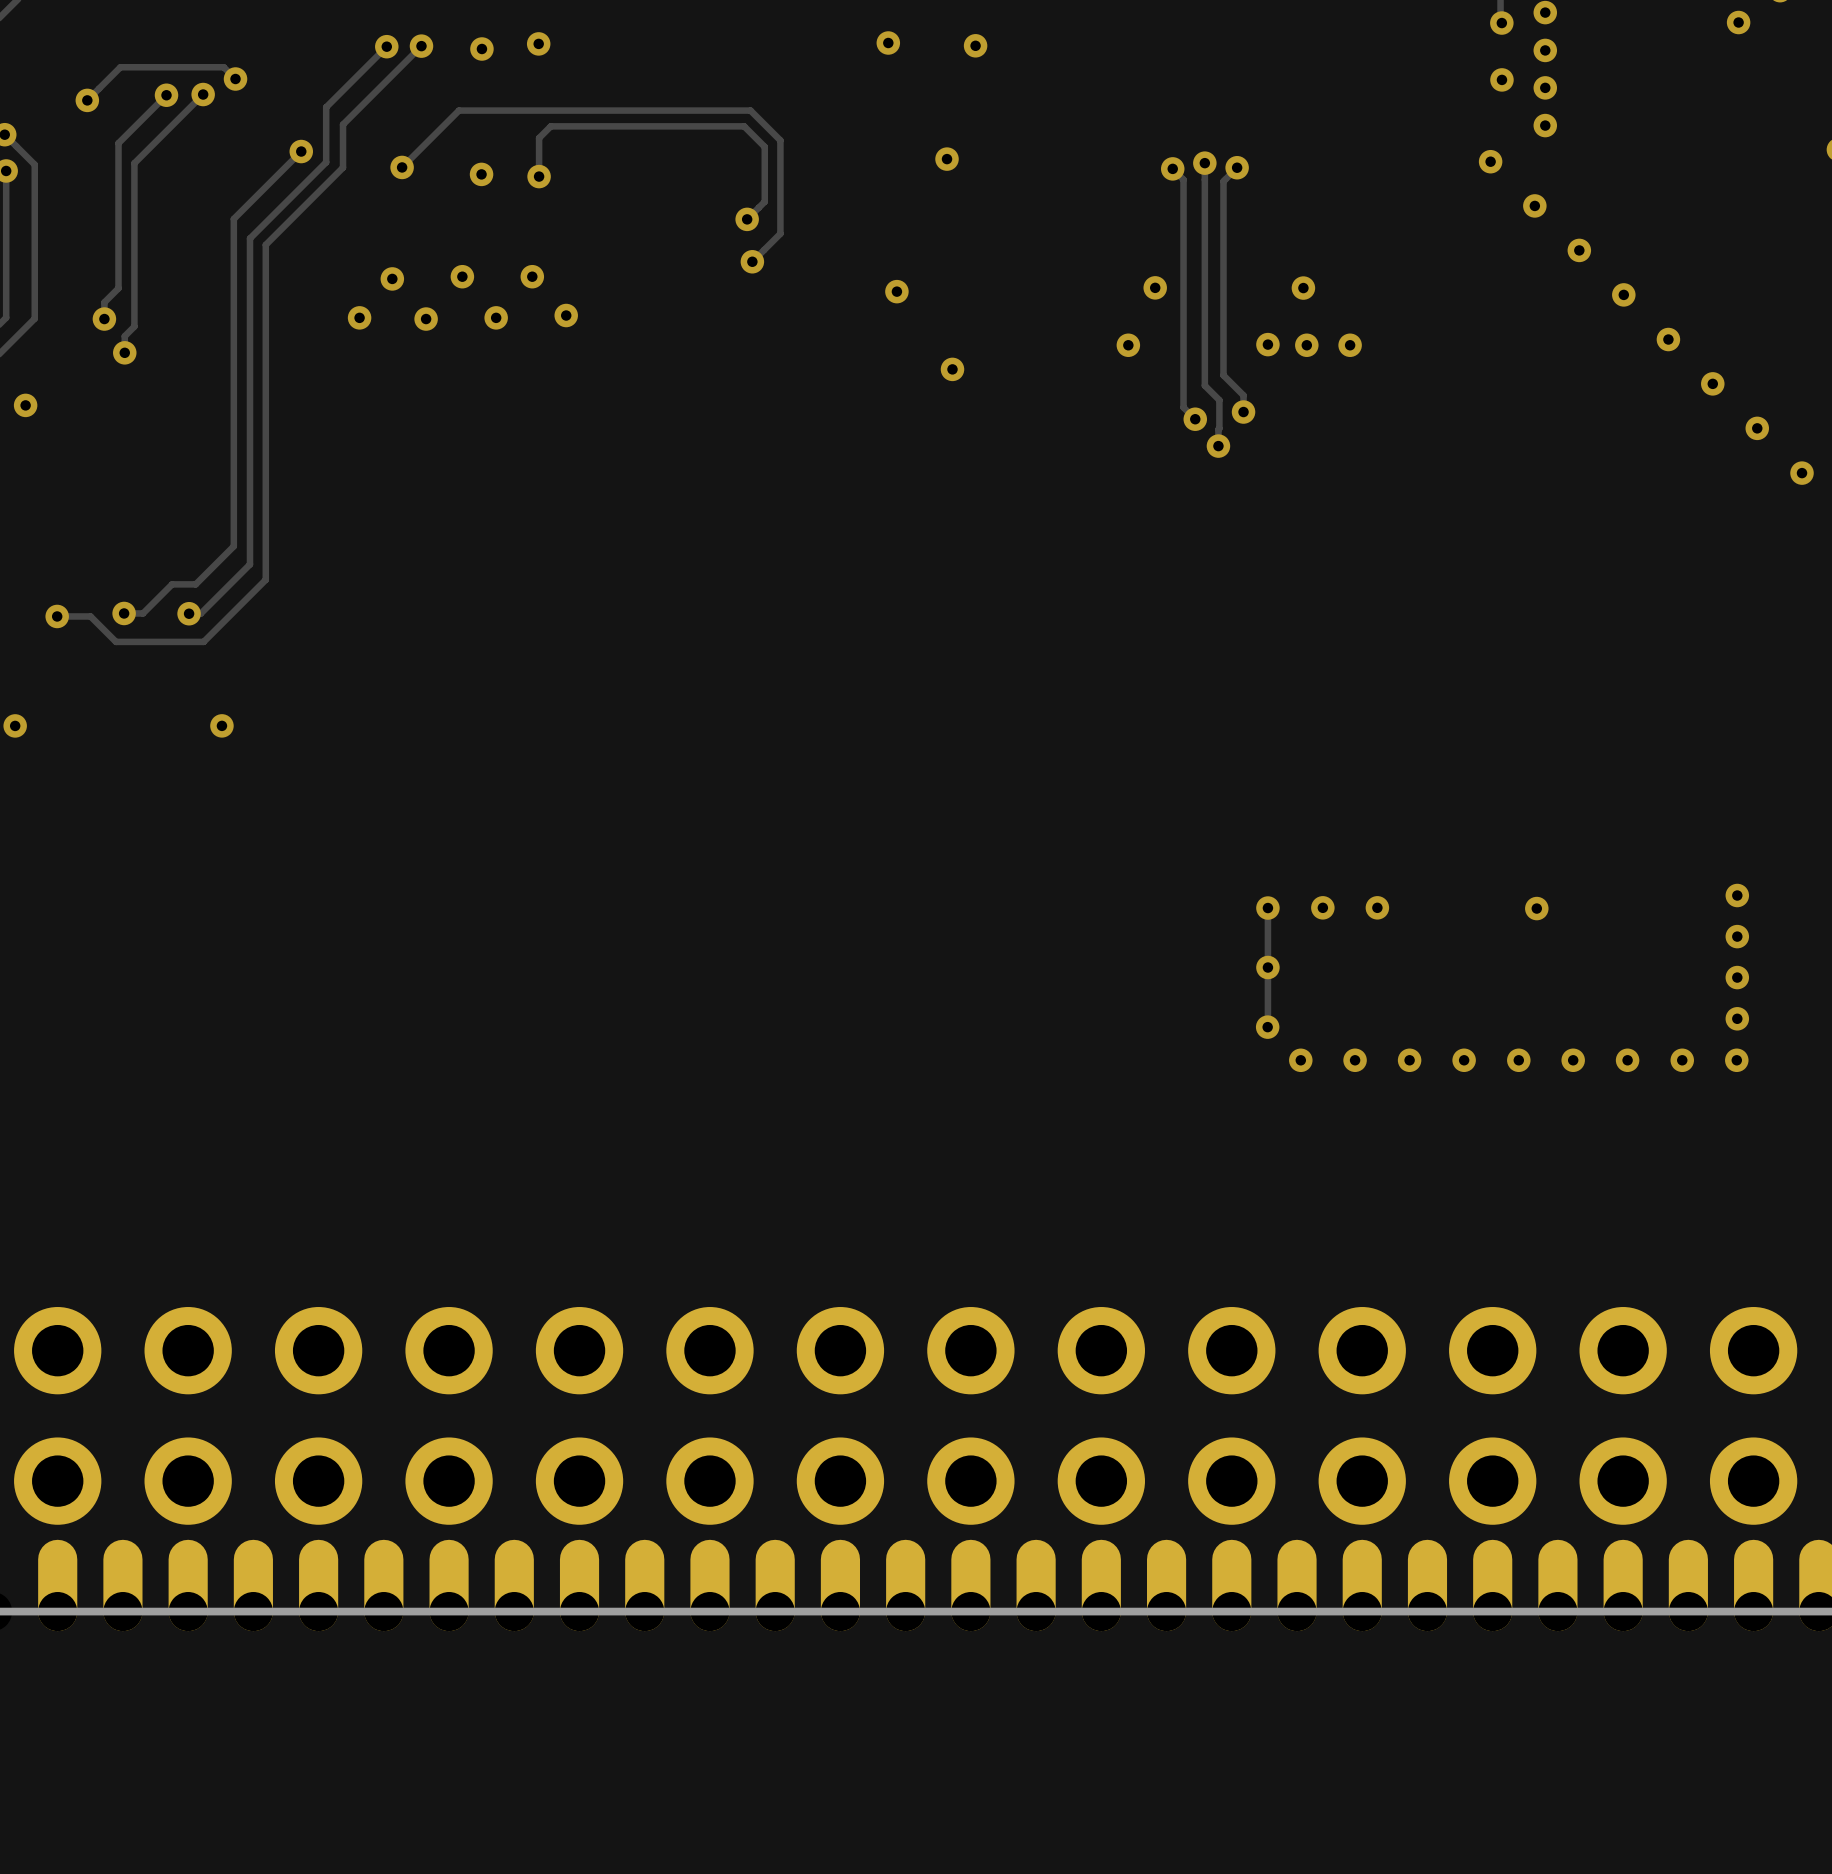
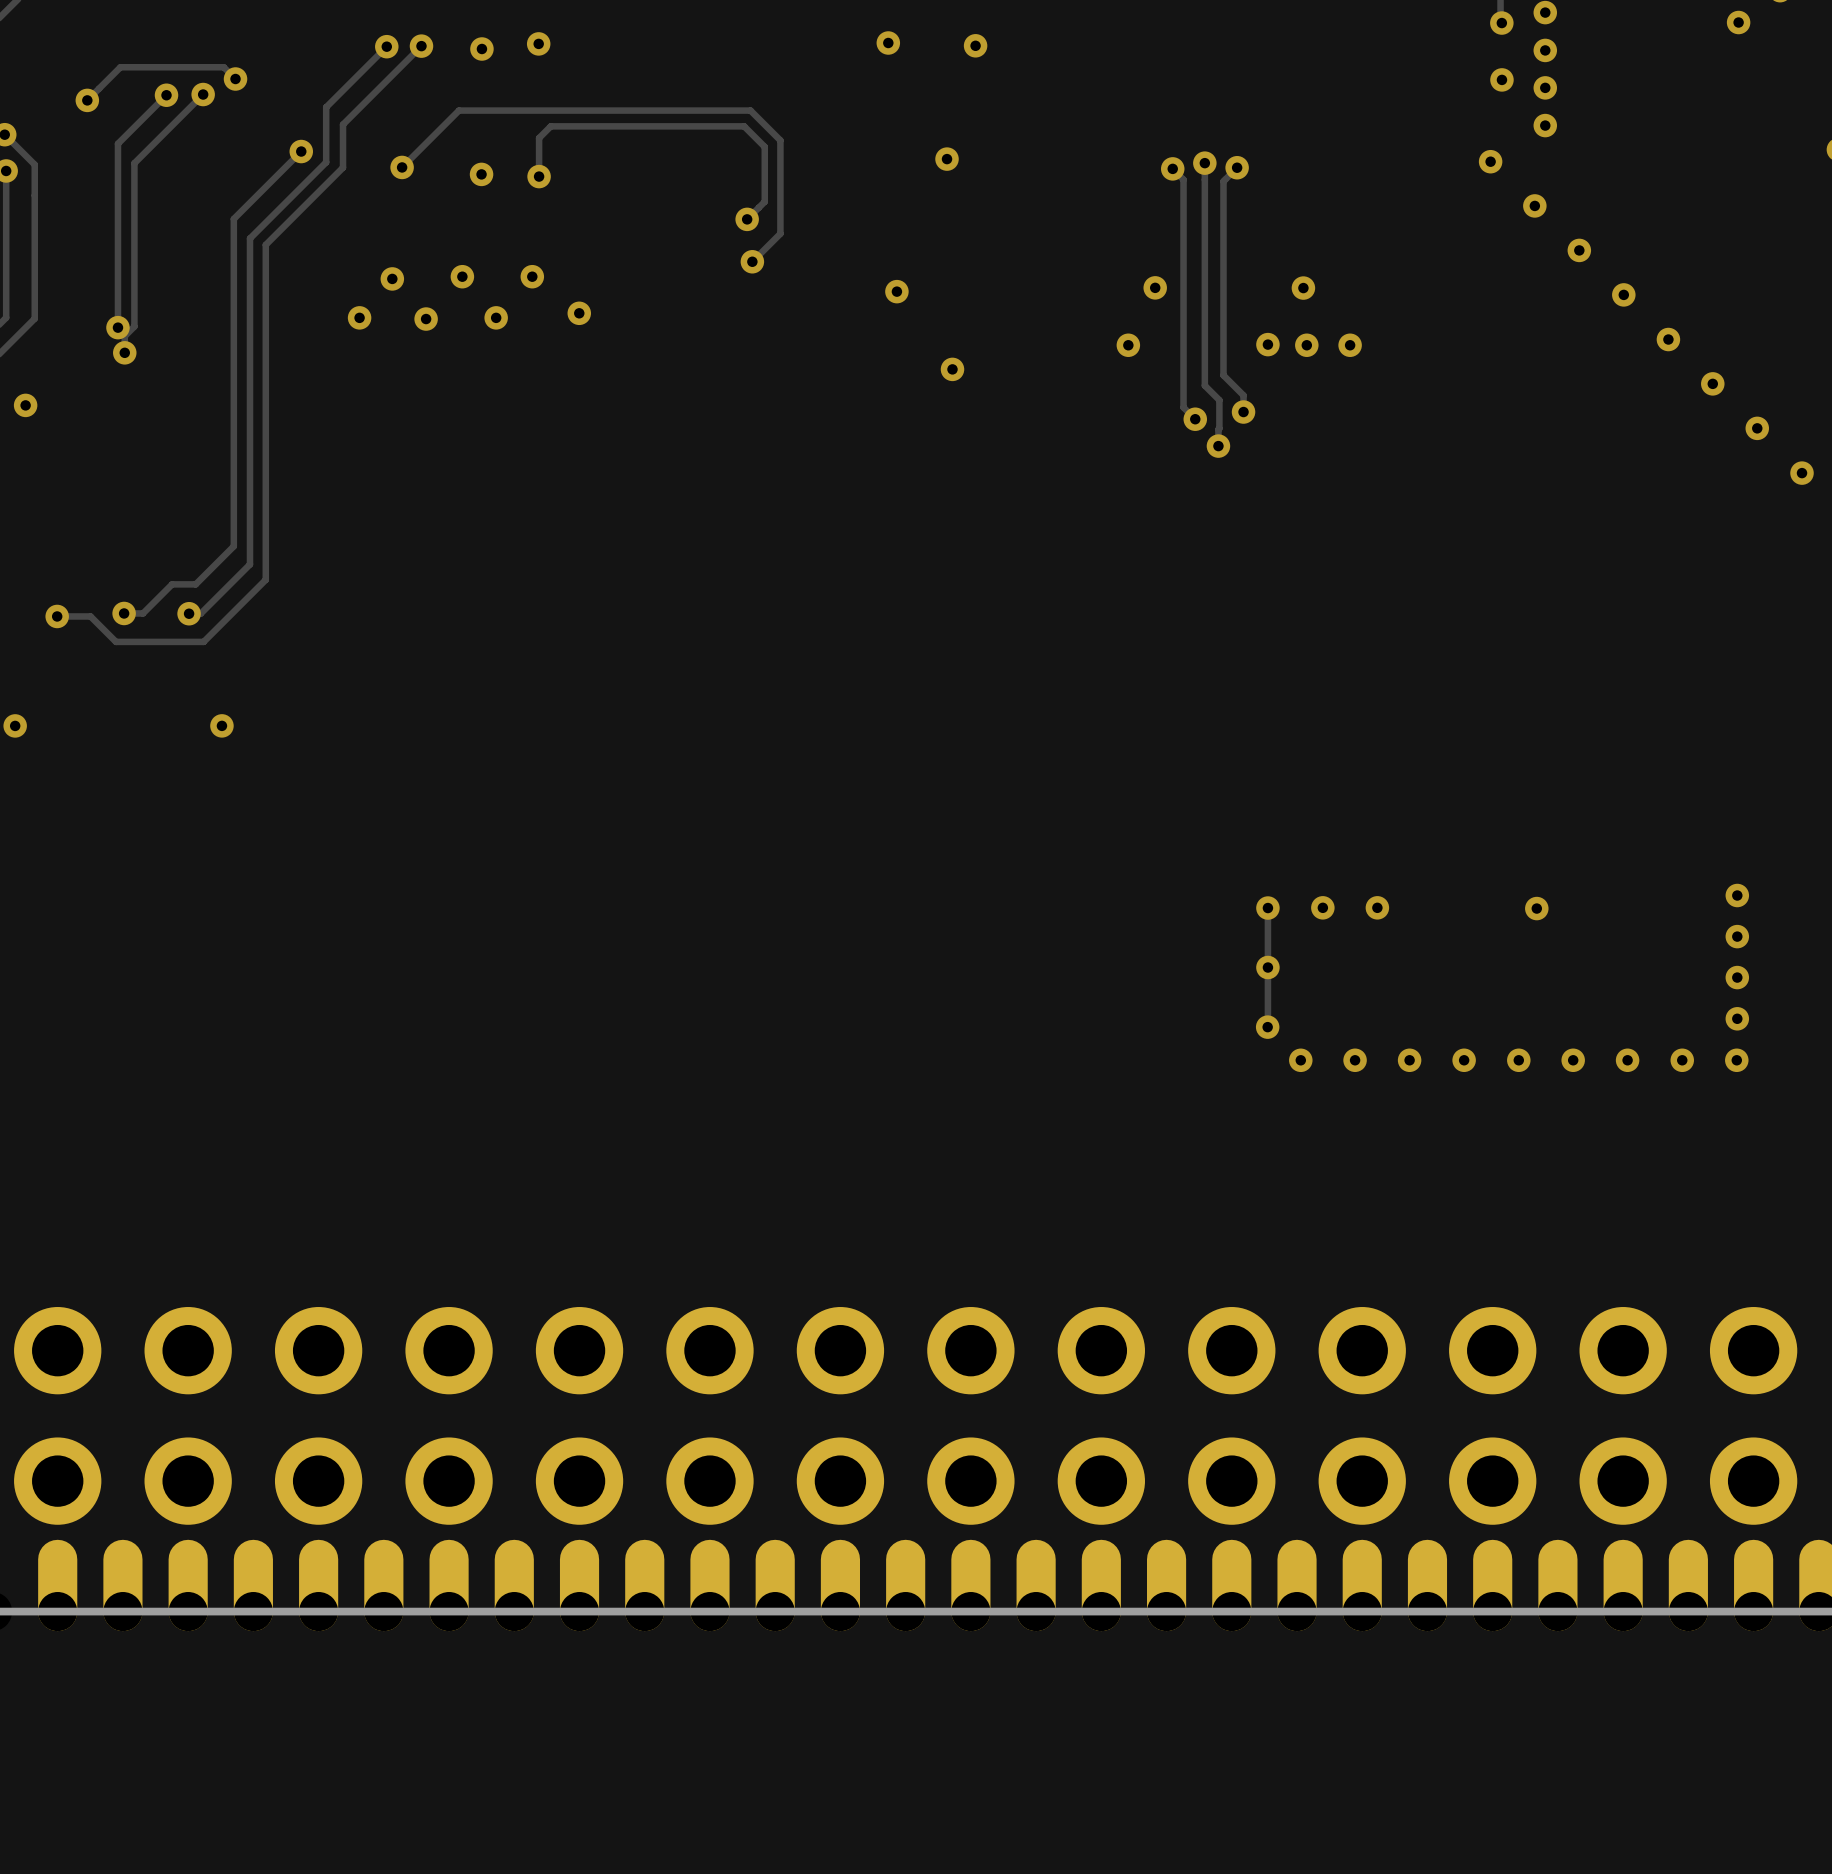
track: (118, 143) (118, 288) (104, 302) (104, 319) -> (117, 143) (117, 327)
via position: (566, 315) -> (579, 313)
via position: (104, 319) -> (117, 327)

